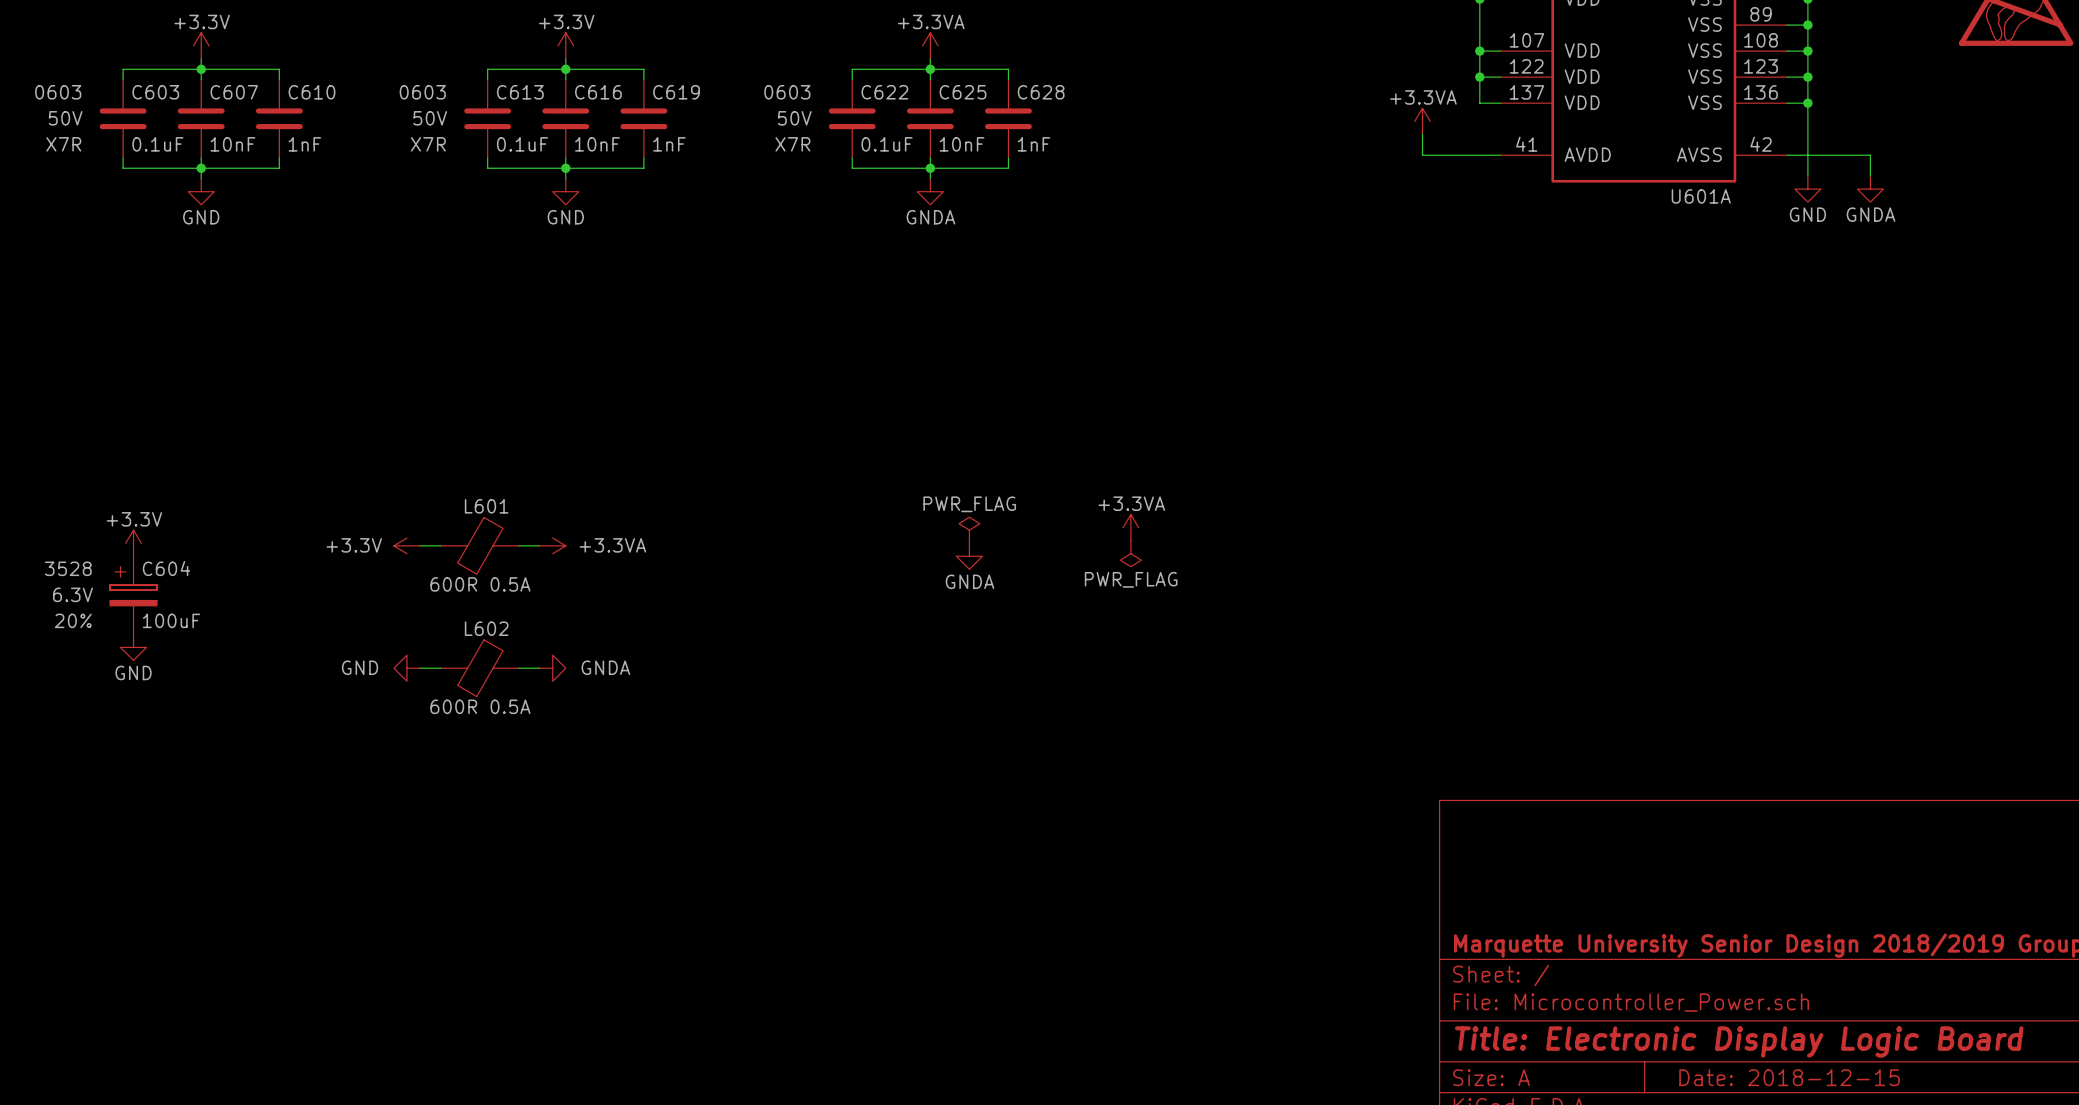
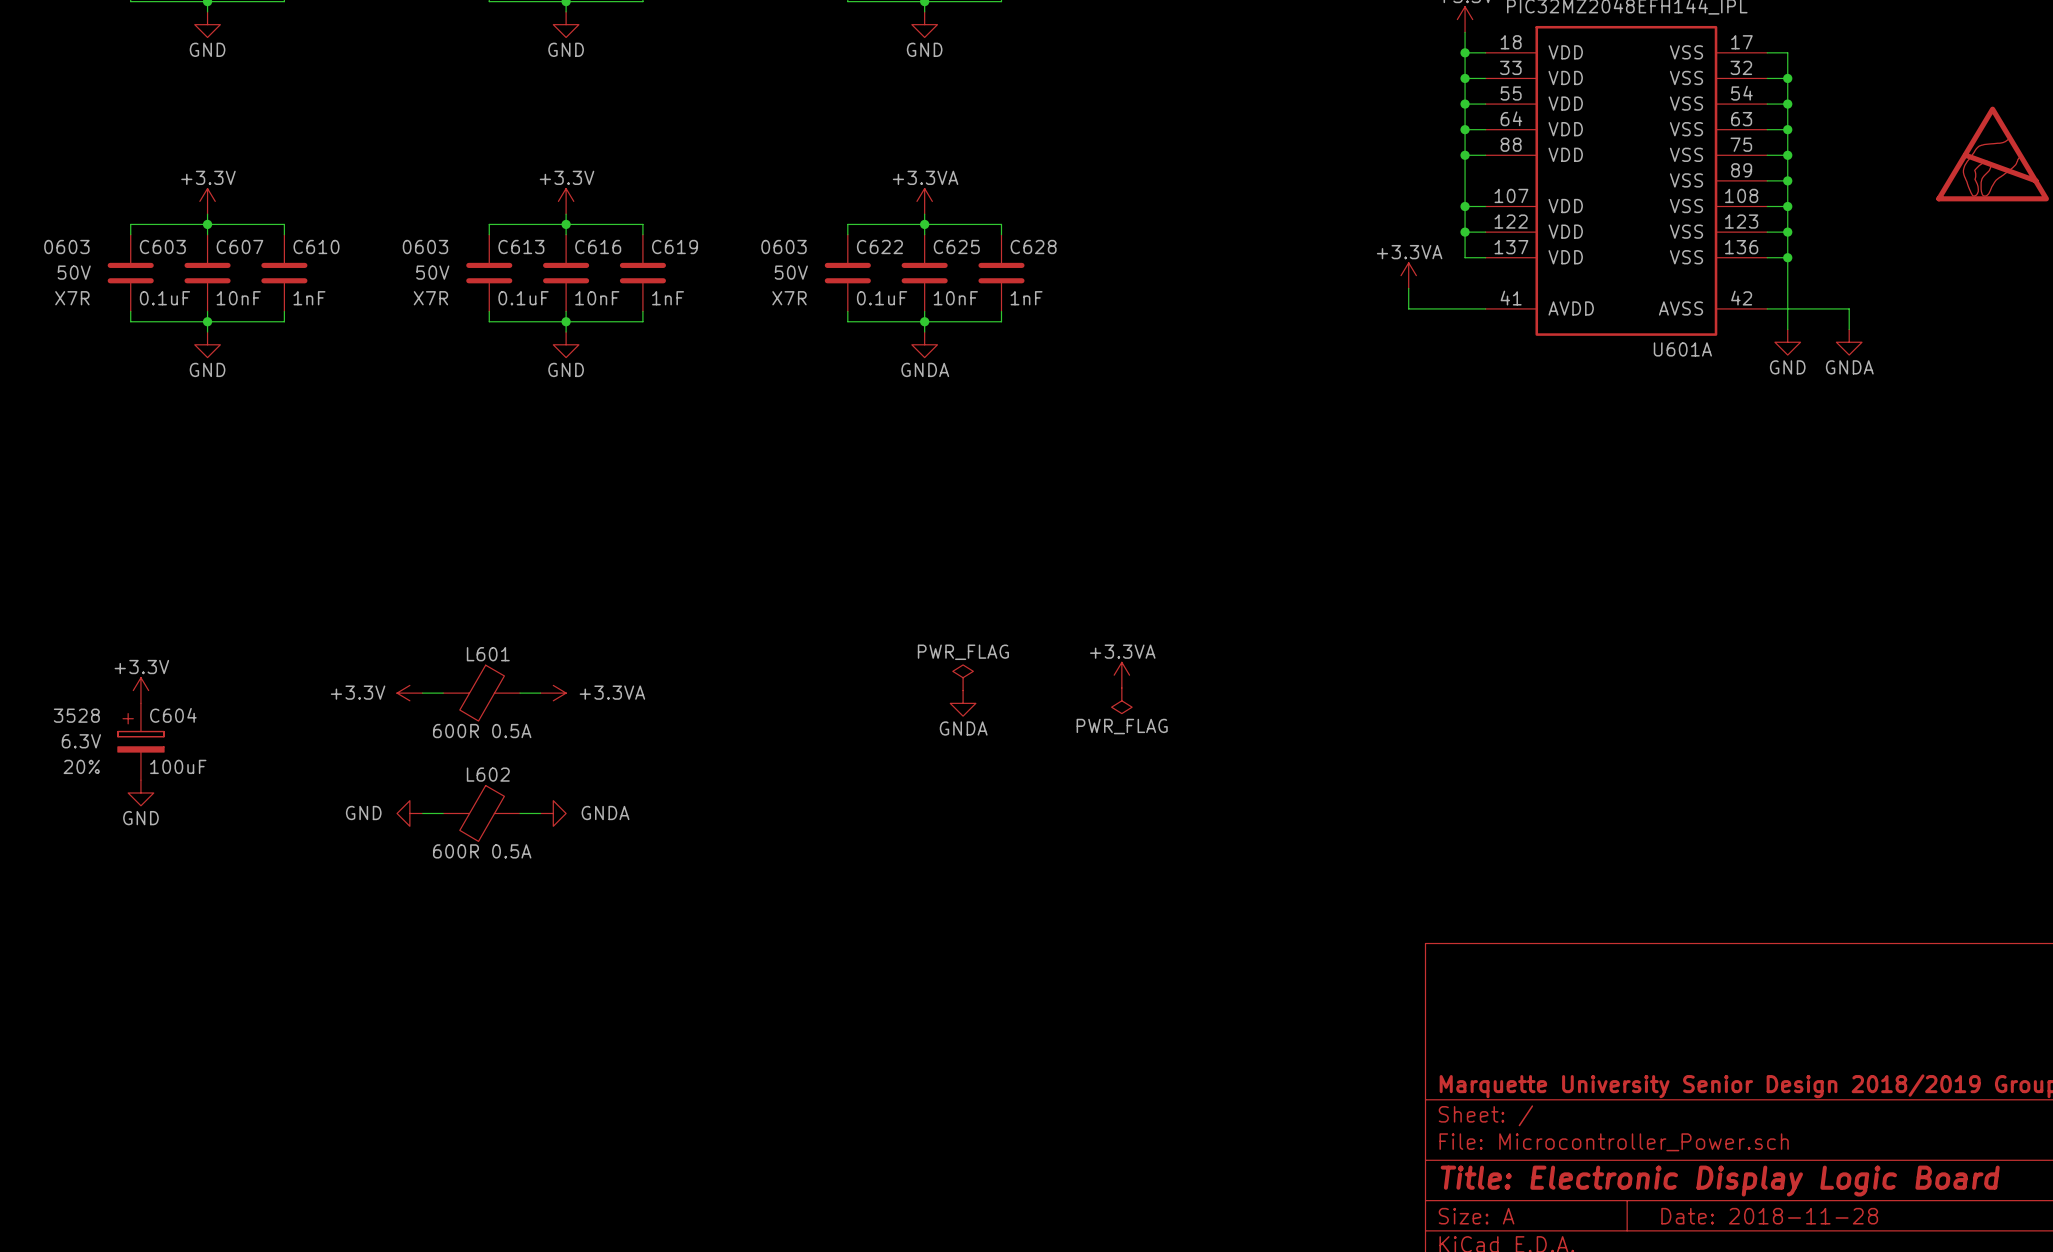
title block: Date: 2018-12-15 (1789, 1077) -> Date: 2018-11-28 (1769, 1216)

